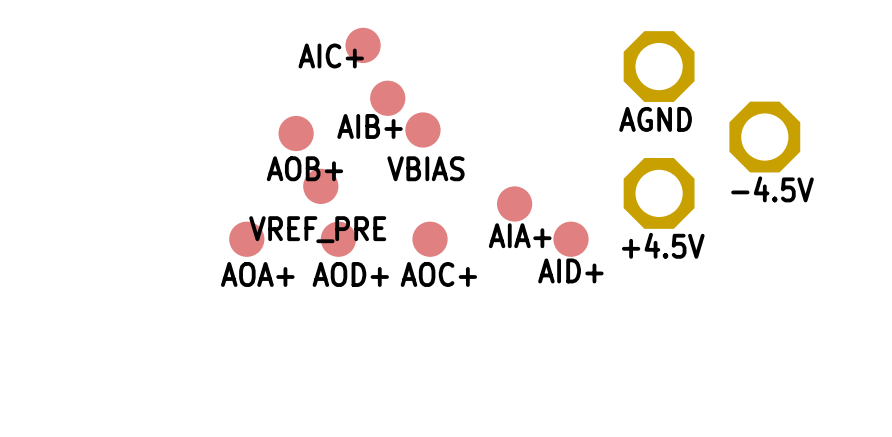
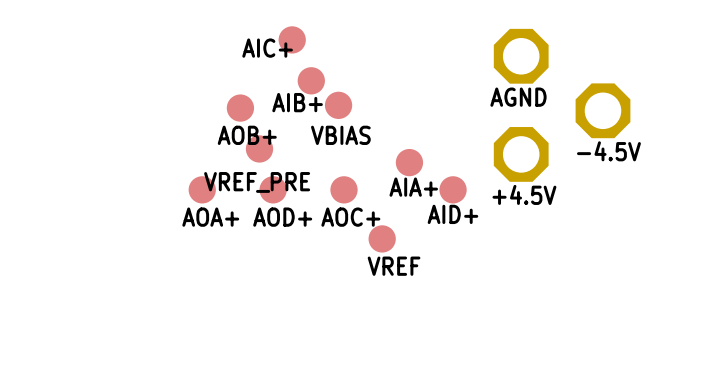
VREF: none -> (382, 238)

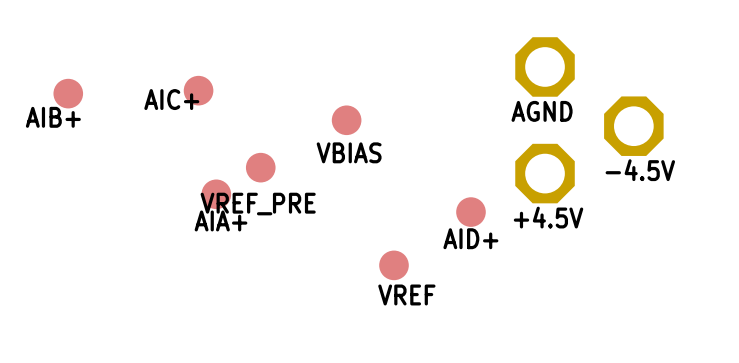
AIC+ position: (292, 39) -> (198, 90)
AIB+ position: (311, 80) -> (68, 93)
AOB+: (240, 108) -> none
AIA+ position: (409, 162) -> (216, 194)
AOA+: (202, 189) -> none
AOD+: (273, 189) -> none
AOC+: (344, 189) -> none

